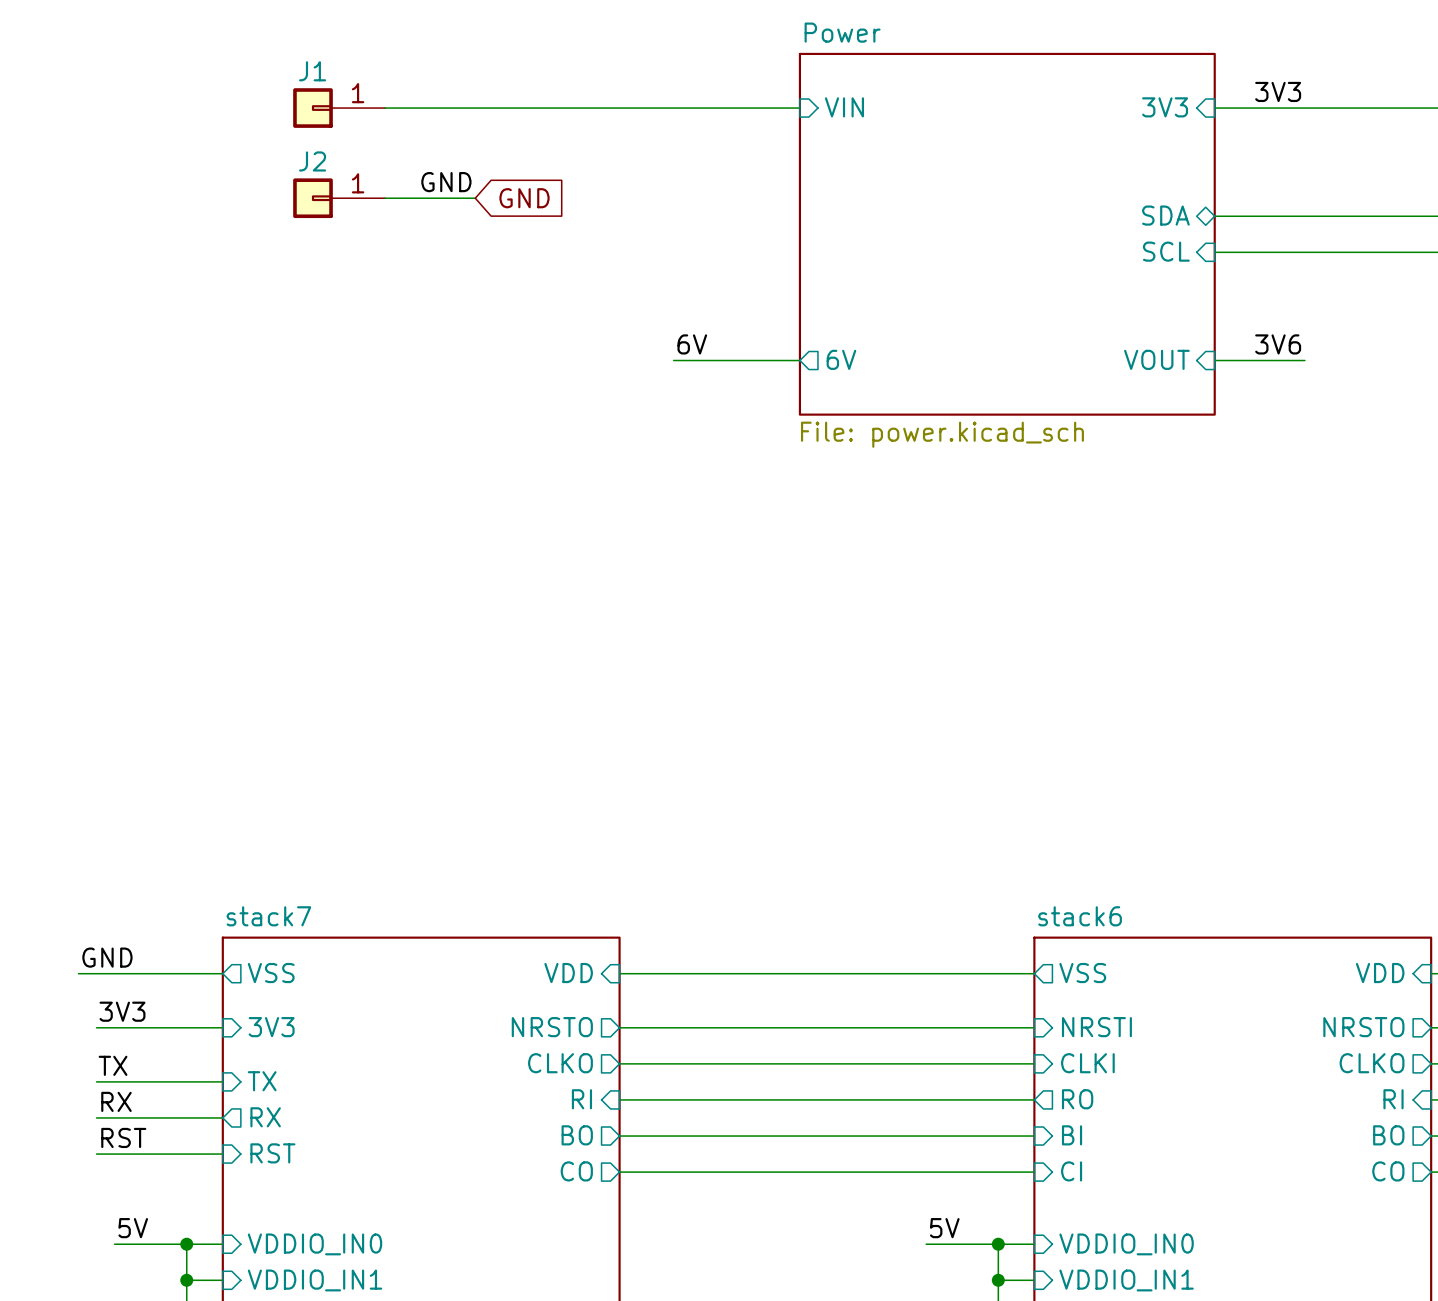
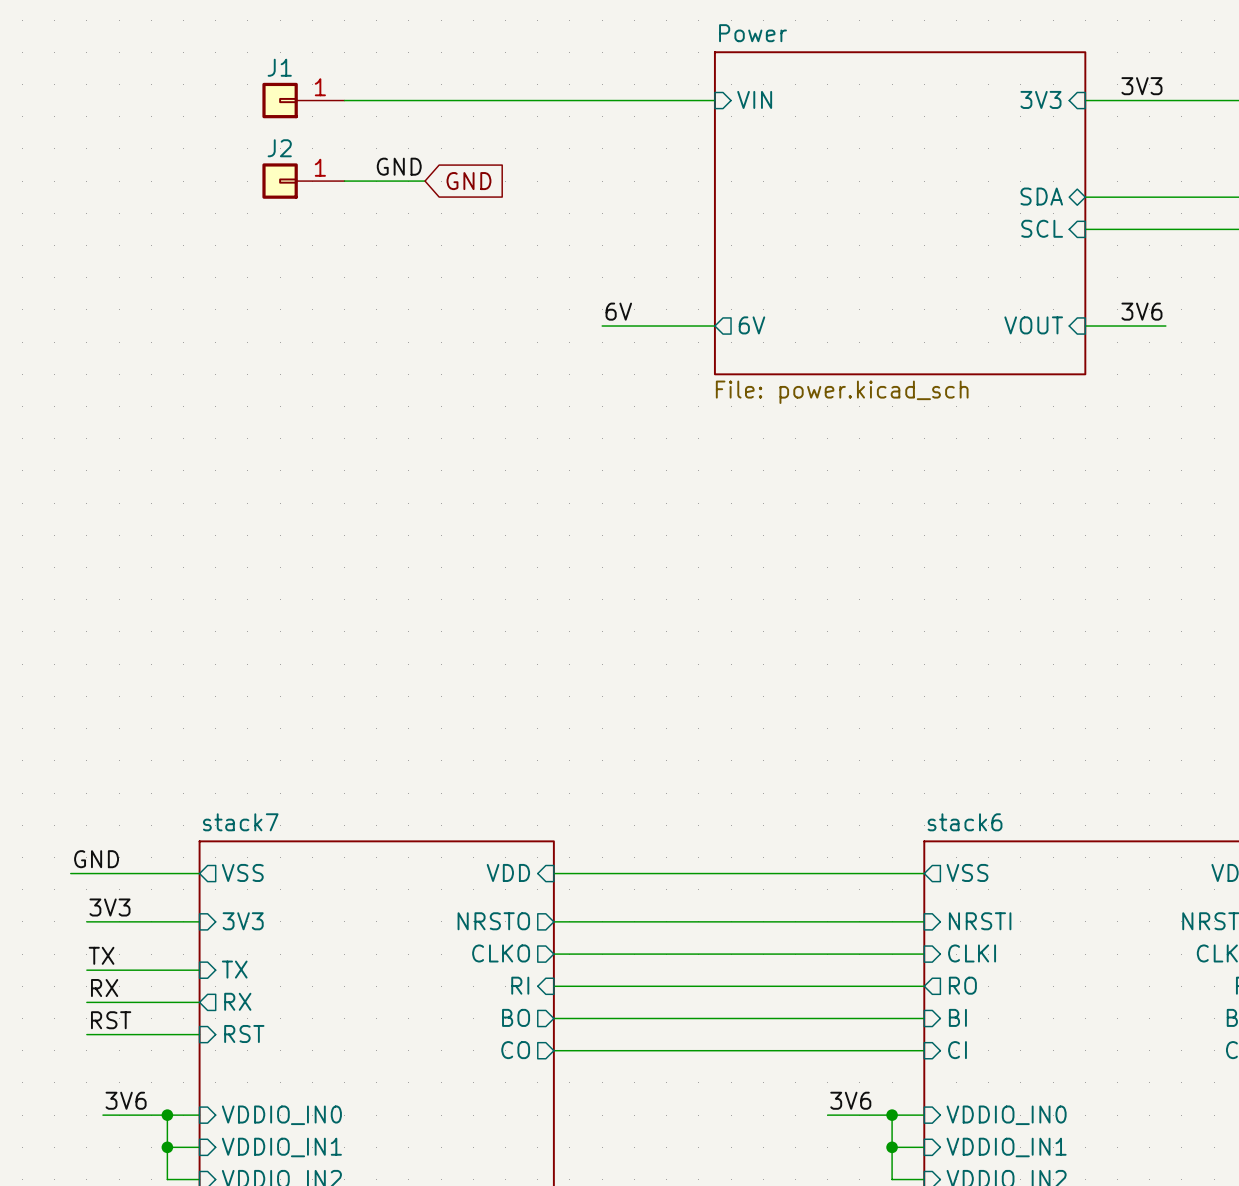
label: 5V (133, 1228) -> 3V6 (126, 1100)
label: 5V (944, 1228) -> 3V6 (850, 1100)

